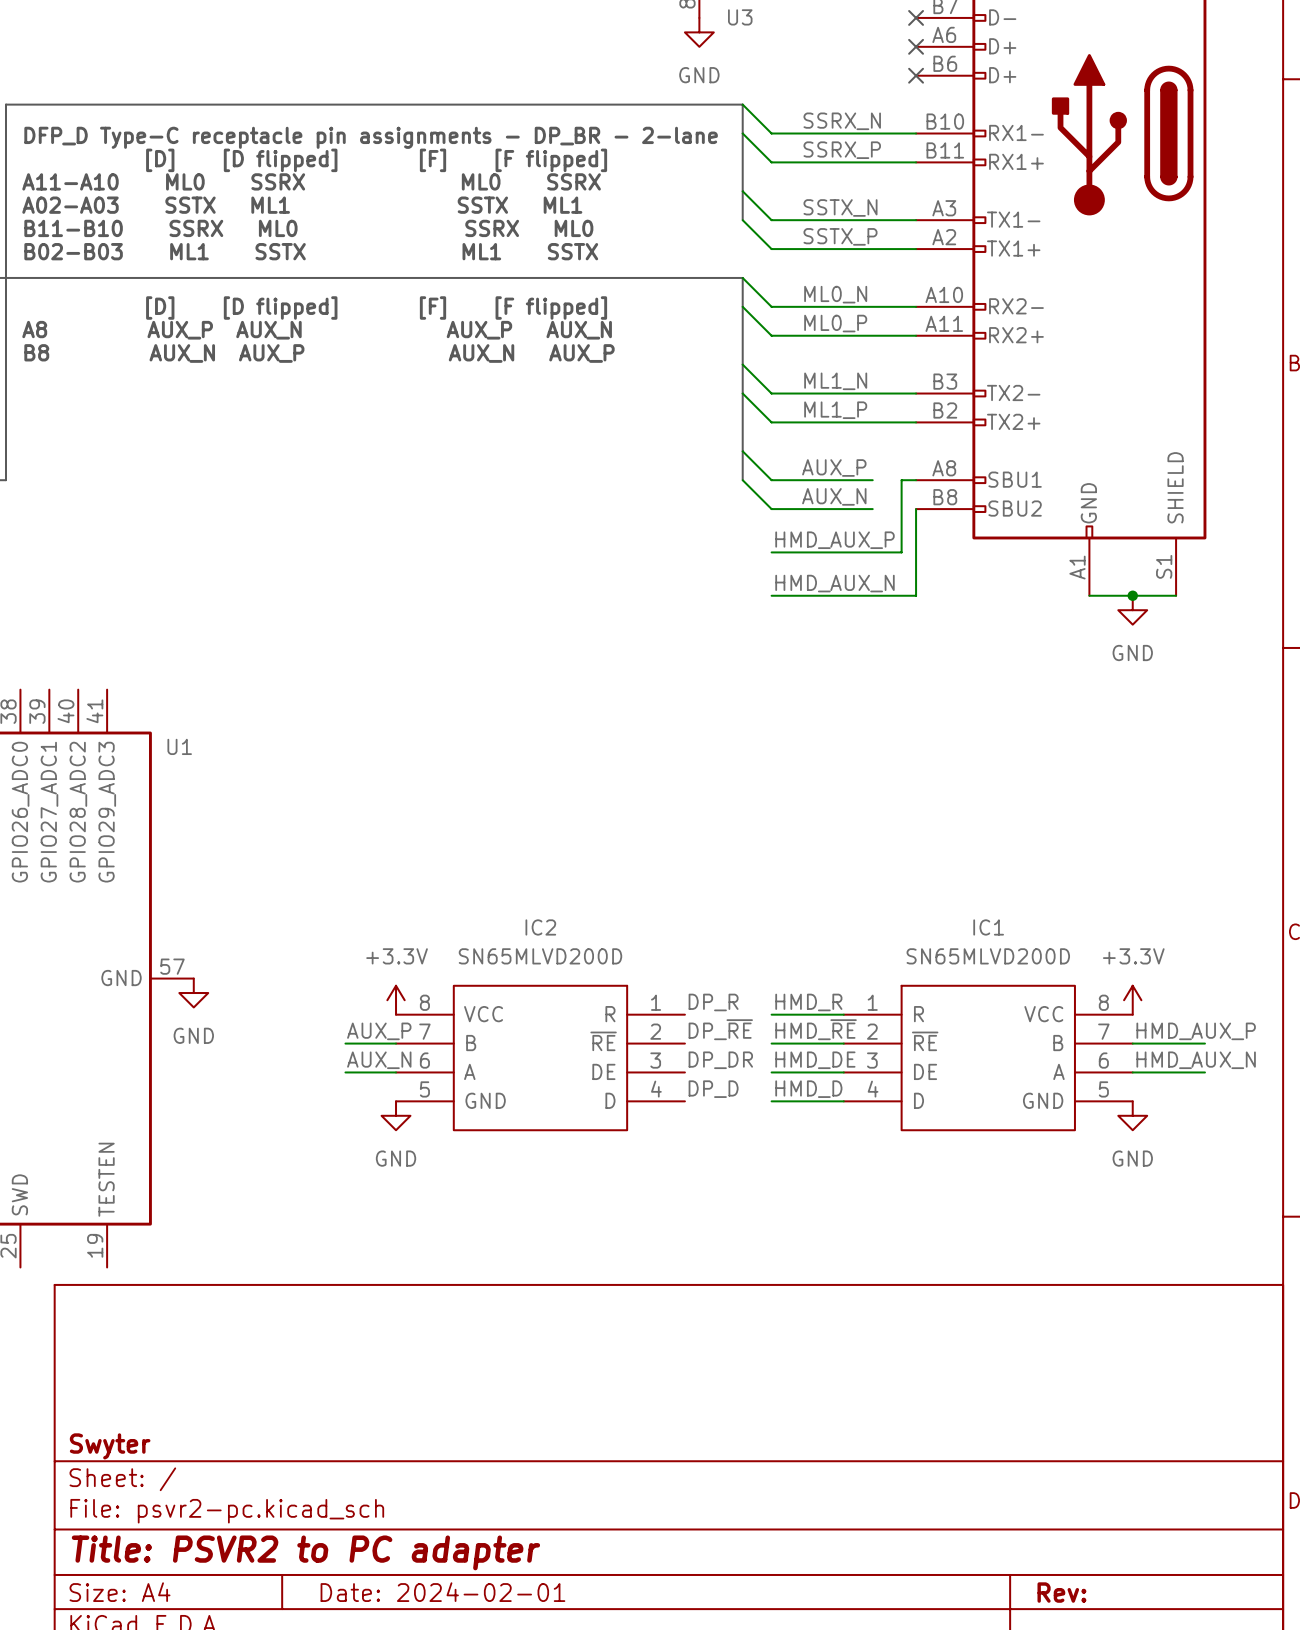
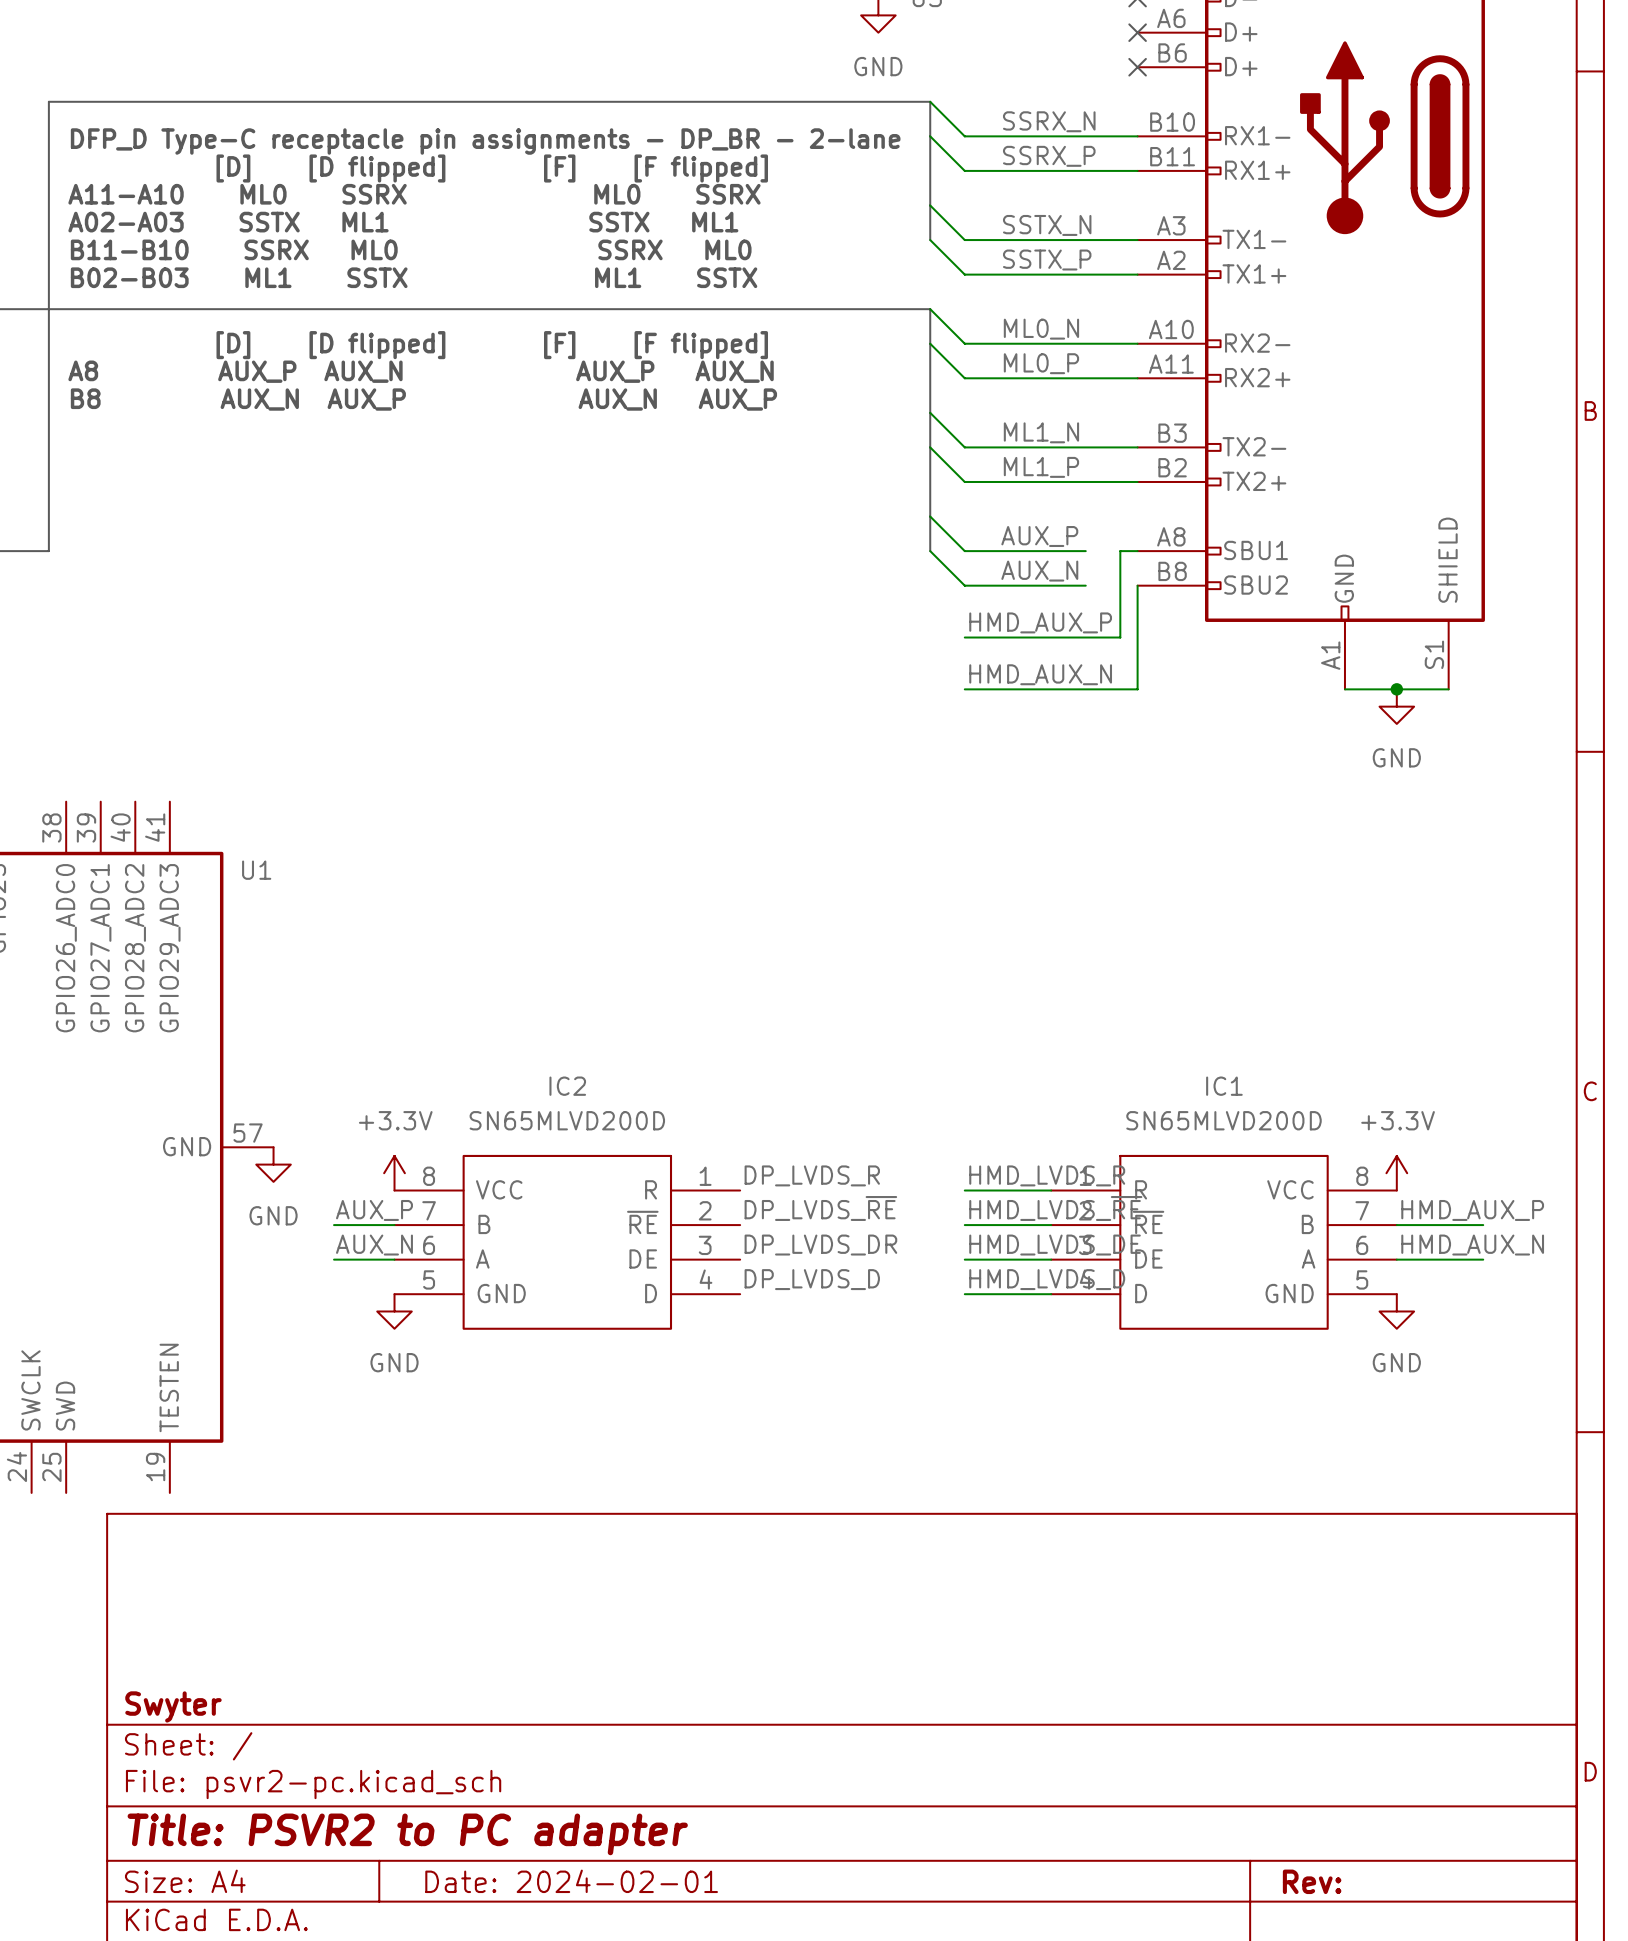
power symbol position: +3.3V (396, 1000) -> +3.3V (394, 1173)
label: DP_R (713, 1002) -> DP_LVDS_R (812, 1175)
label: HMD_R (808, 1002) -> HMD_LVDS_R (1047, 1175)
label: DP_~{RE} (720, 1029) -> DP_LVDS_~{RE} (820, 1208)
label: HMD_~{RE} (816, 1029) -> HMD_LVDS_~{RE} (1055, 1208)
label position: AUX_P (379, 1031) -> AUX_P (374, 1210)
wire: (345, 1043) (396, 1043) -> (334, 1225) (394, 1225)
IC2 position: (540, 1058) -> (567, 1242)
label position: AUX_N (379, 1060) -> AUX_N (374, 1245)
label: DP_DR (720, 1060) -> DP_LVDS_DR (820, 1245)
label: HMD_DE (815, 1060) -> HMD_LVDS_DE (1055, 1245)
wire: (345, 1072) (396, 1072) -> (334, 1259) (394, 1259)
label: DP_D (713, 1089) -> DP_LVDS_D (812, 1279)
label: HMD_D (808, 1089) -> HMD_LVDS_D (1047, 1279)
power symbol position: GND (396, 1115) -> GND (394, 1311)

